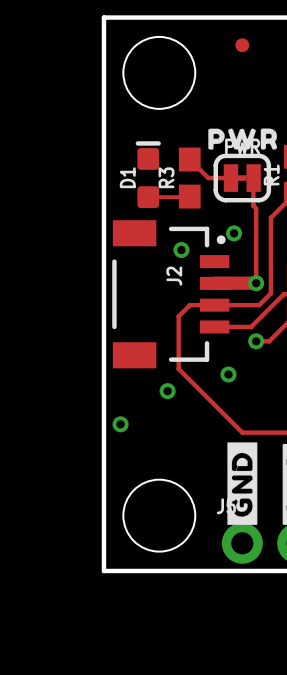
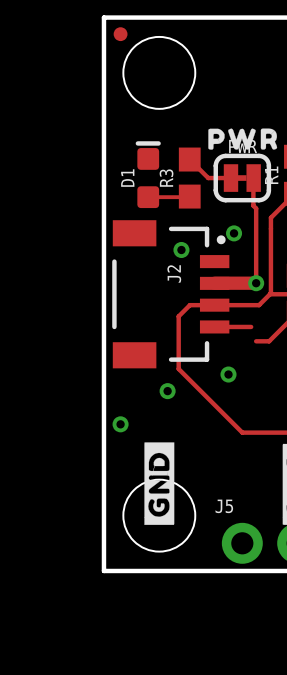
part position: (242, 45) -> (120, 34)
track: (283, 294) (251, 326) -> (283, 294) (270, 294)
via: (256, 341) -> none
drawing position: (242, 483) -> (159, 483)

